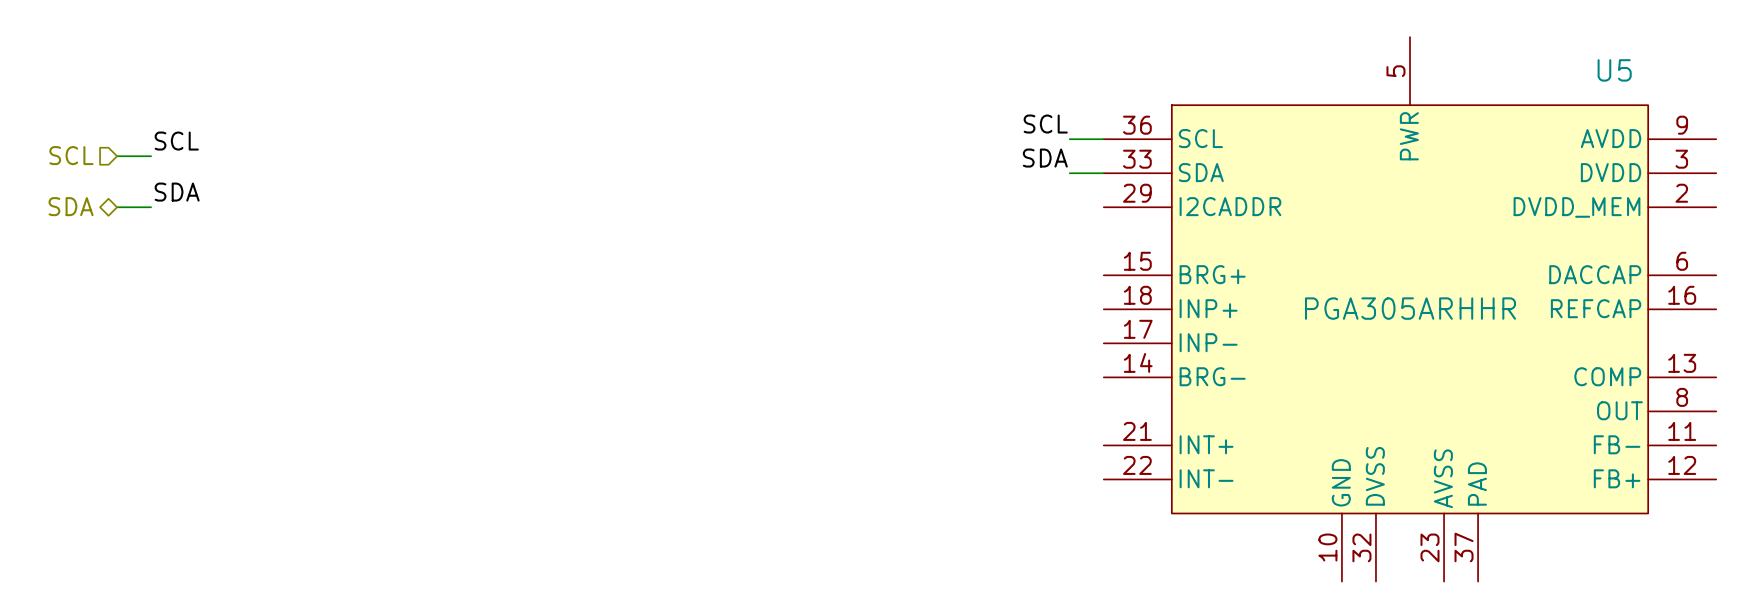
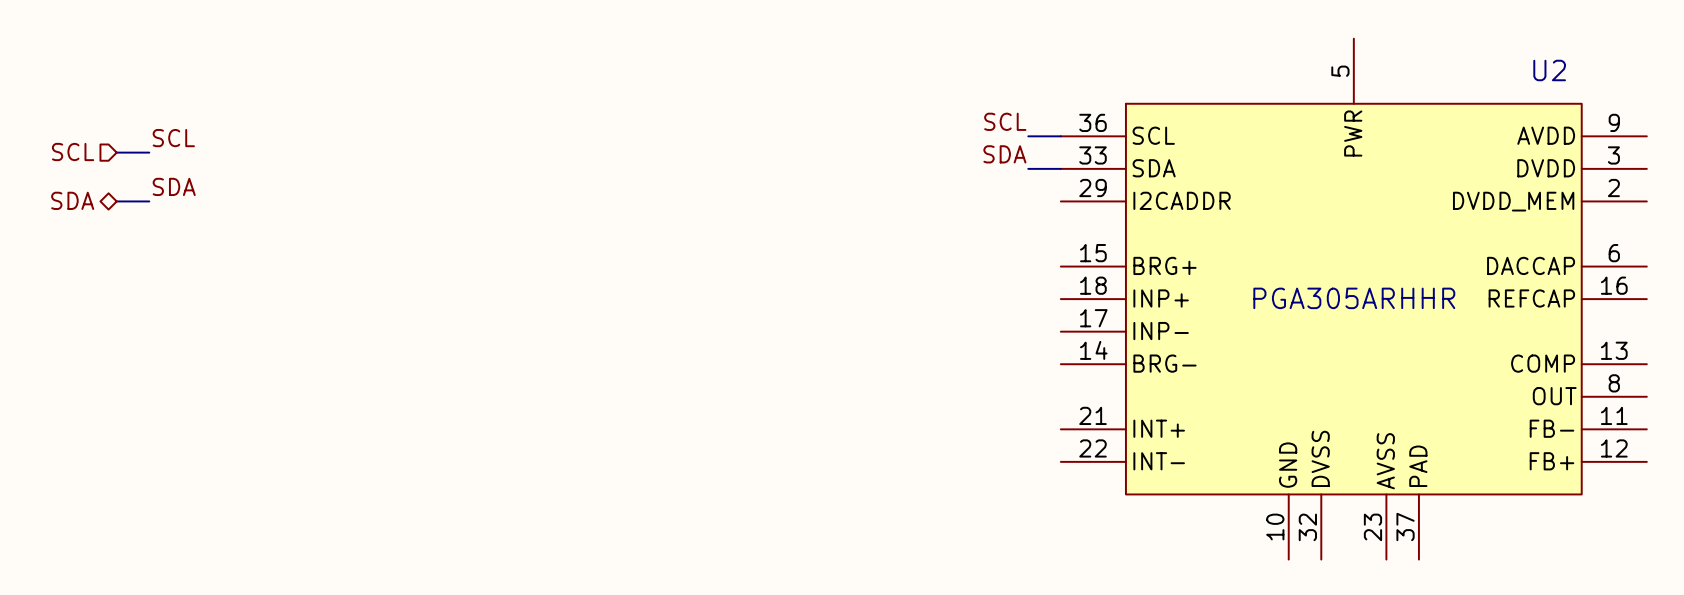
U5 name: U5 (1614, 70) -> U2 (1549, 70)

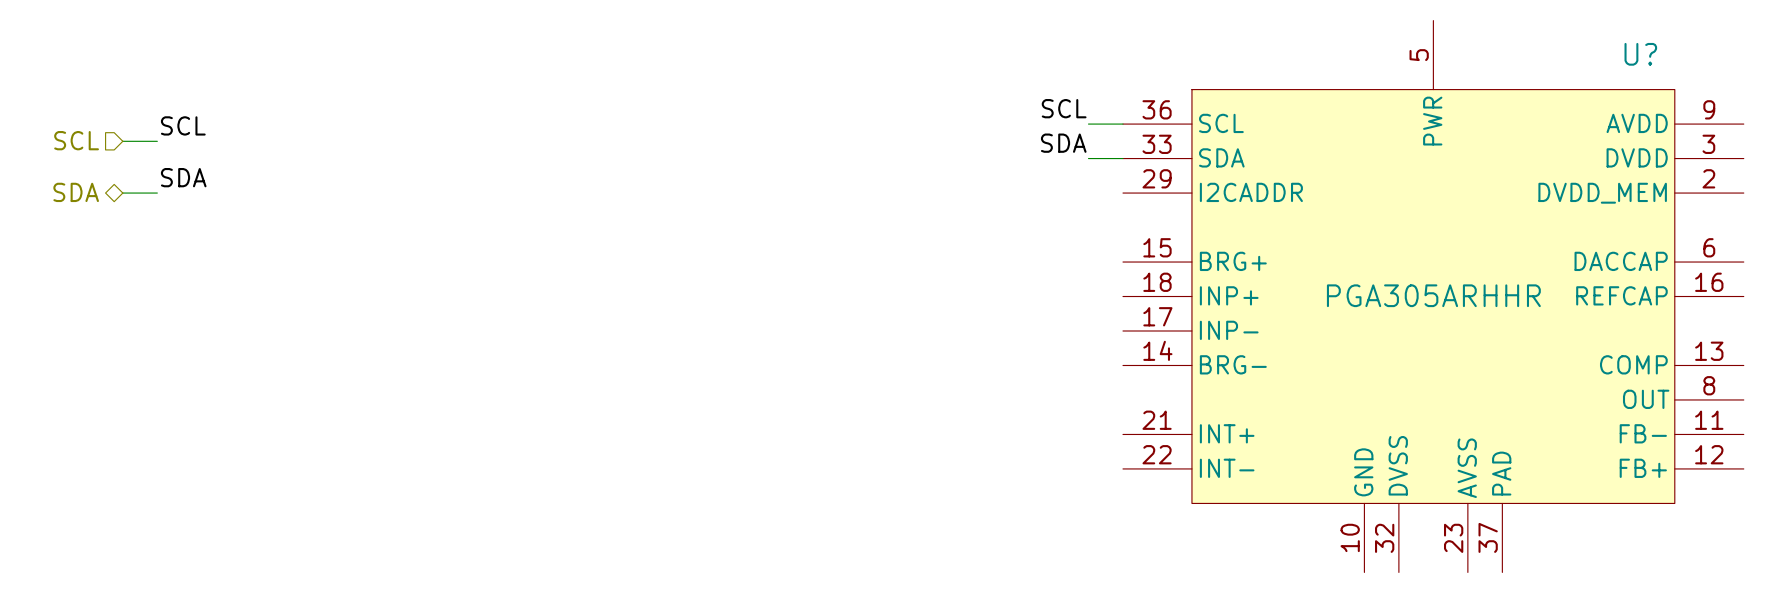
U2 name: U2 (1549, 70) -> U? (1640, 54)

